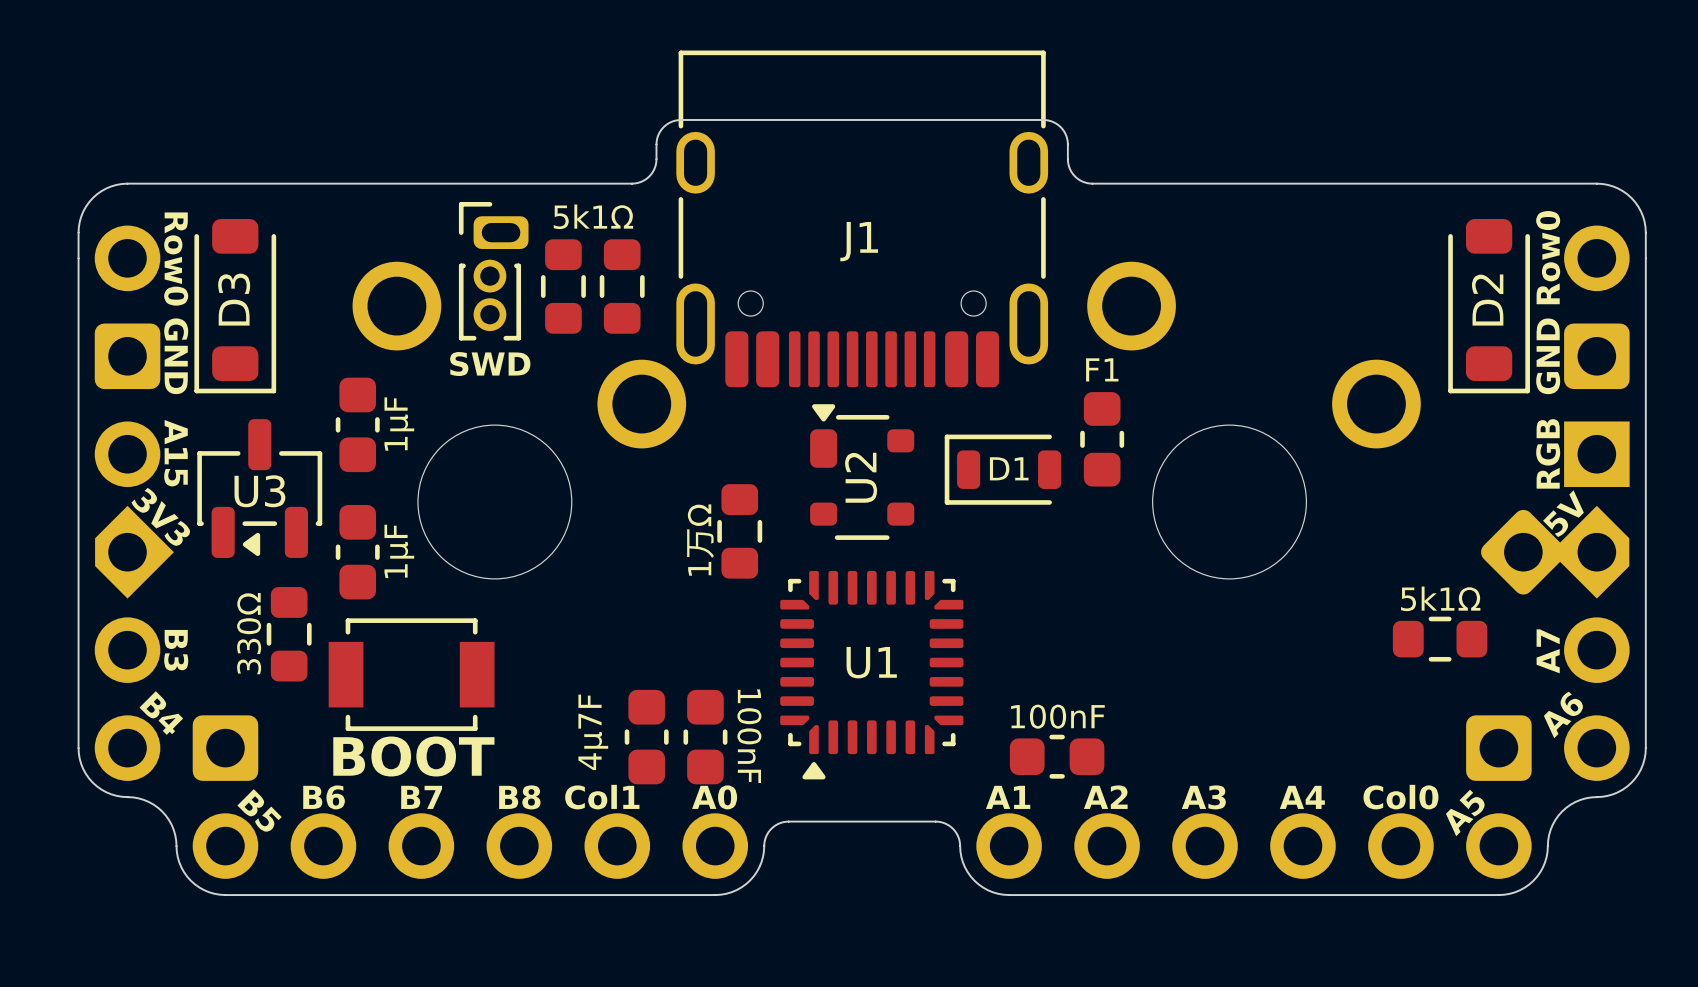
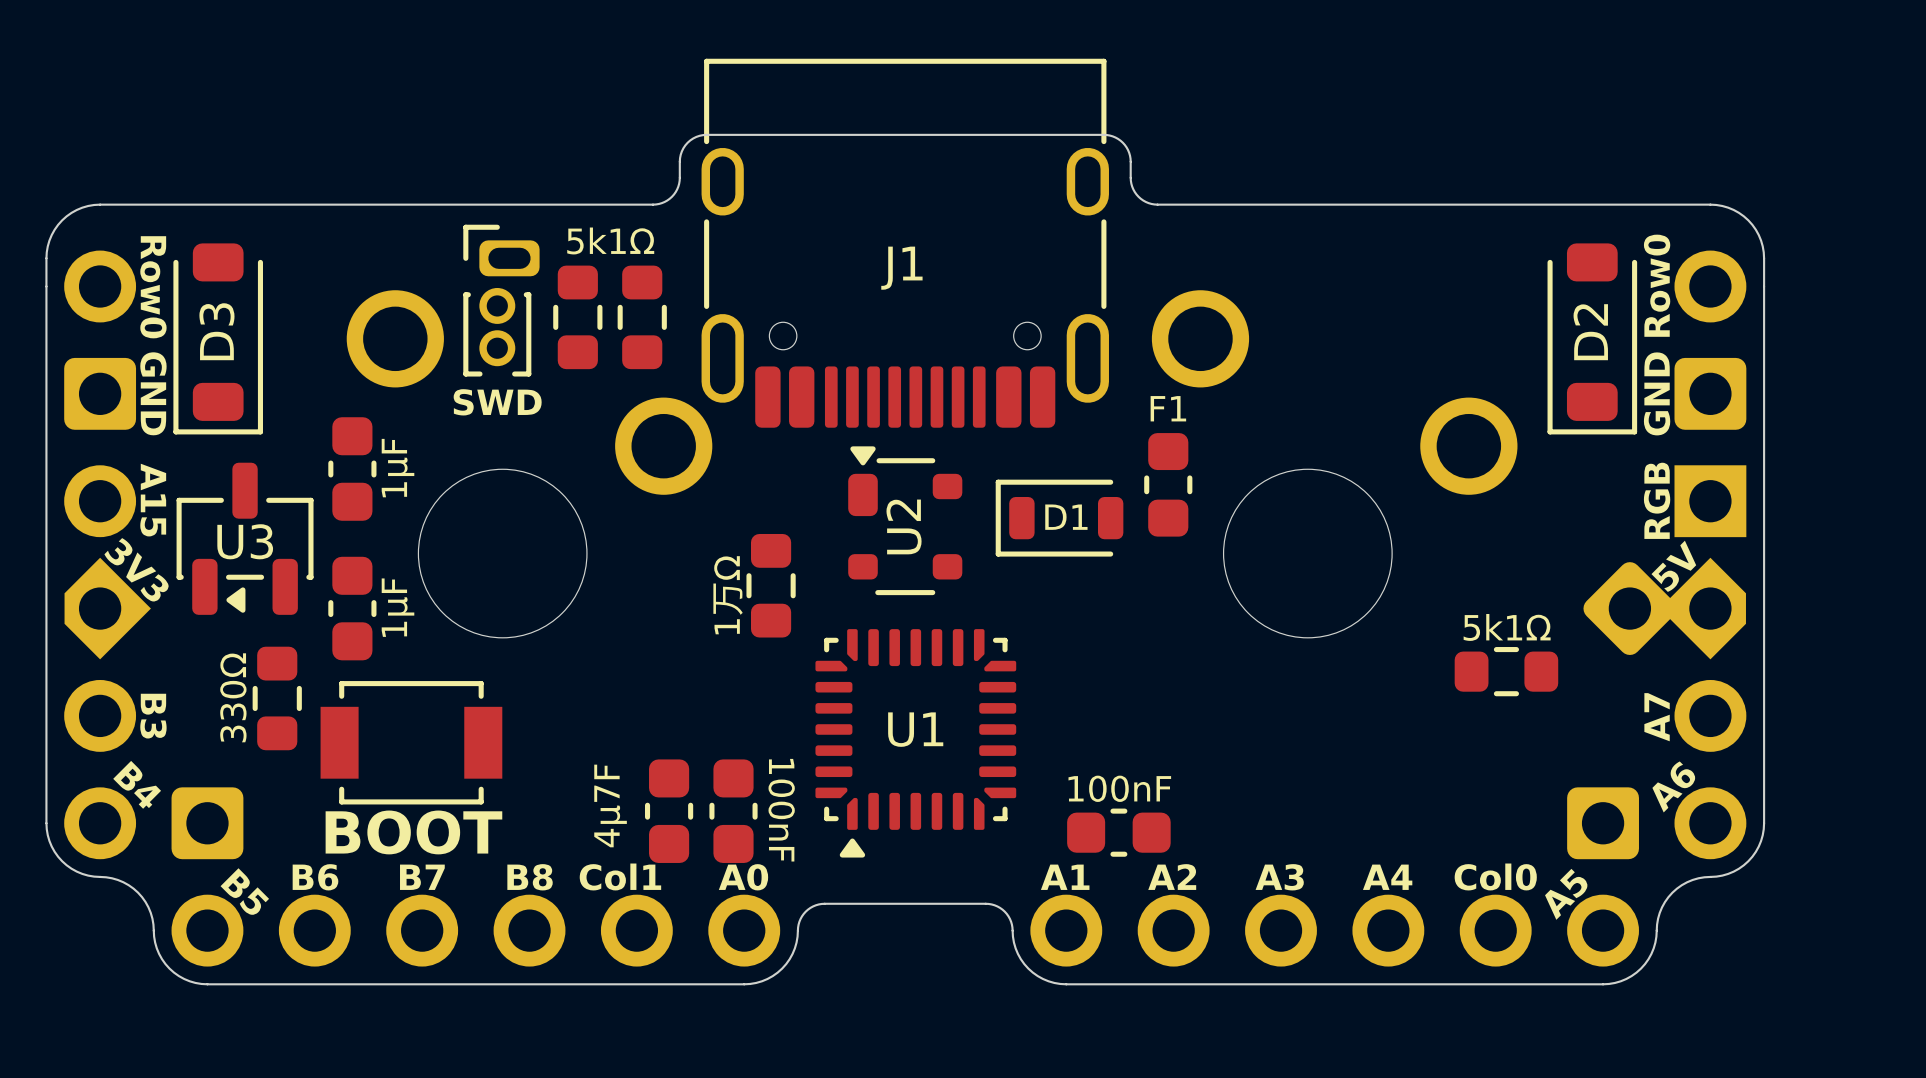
part position: (1440, 639) -> (1506, 671)

